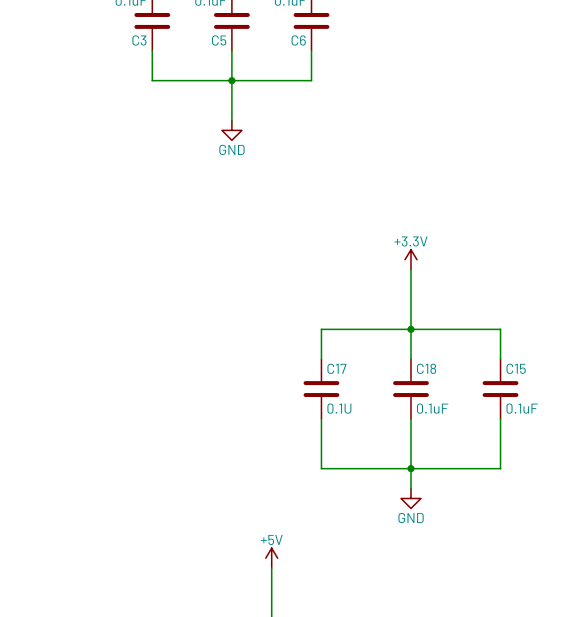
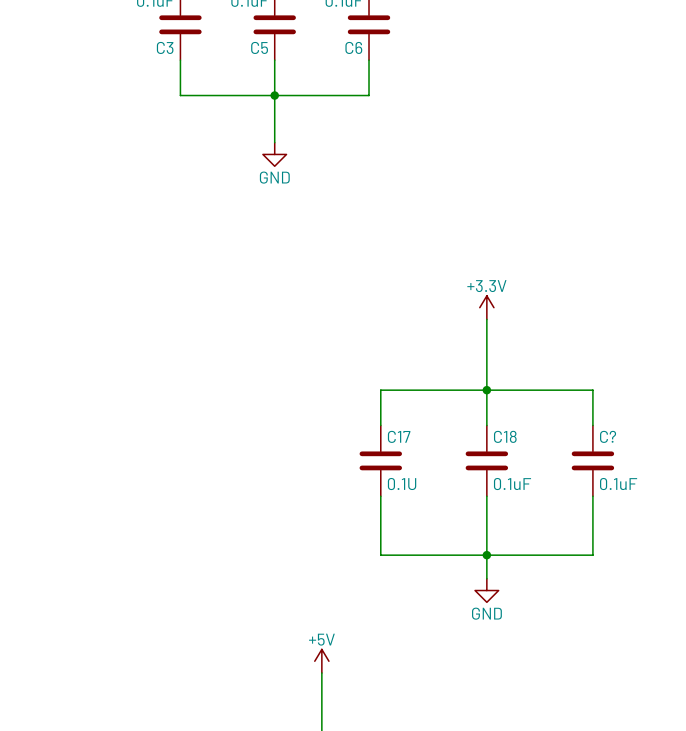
C15 name: C15 (516, 368) -> C? (608, 436)

